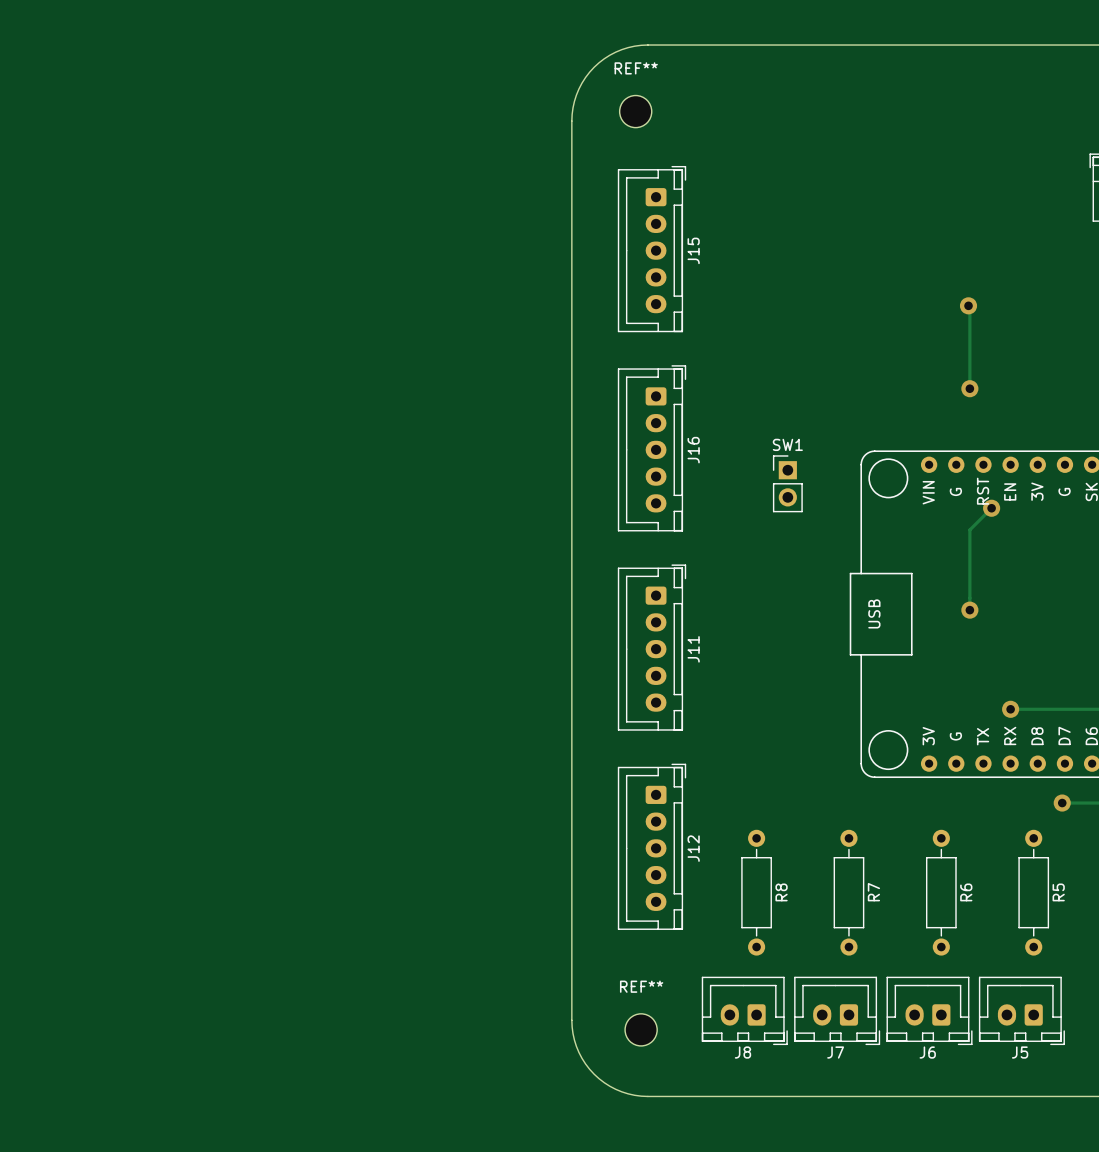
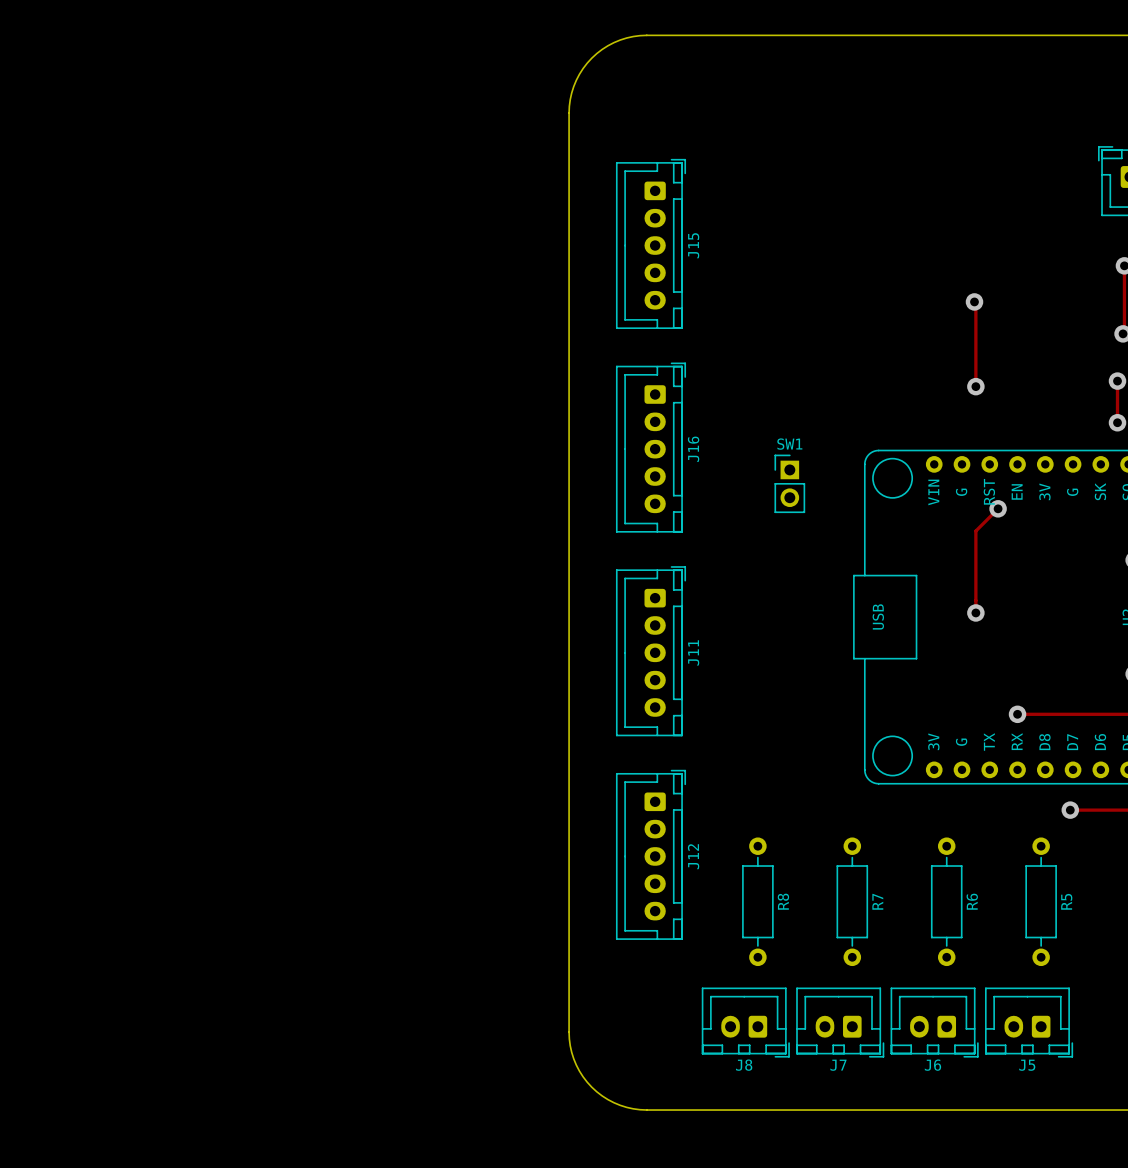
REF**: (635, 111) -> none
REF**: (641, 1029) -> none

